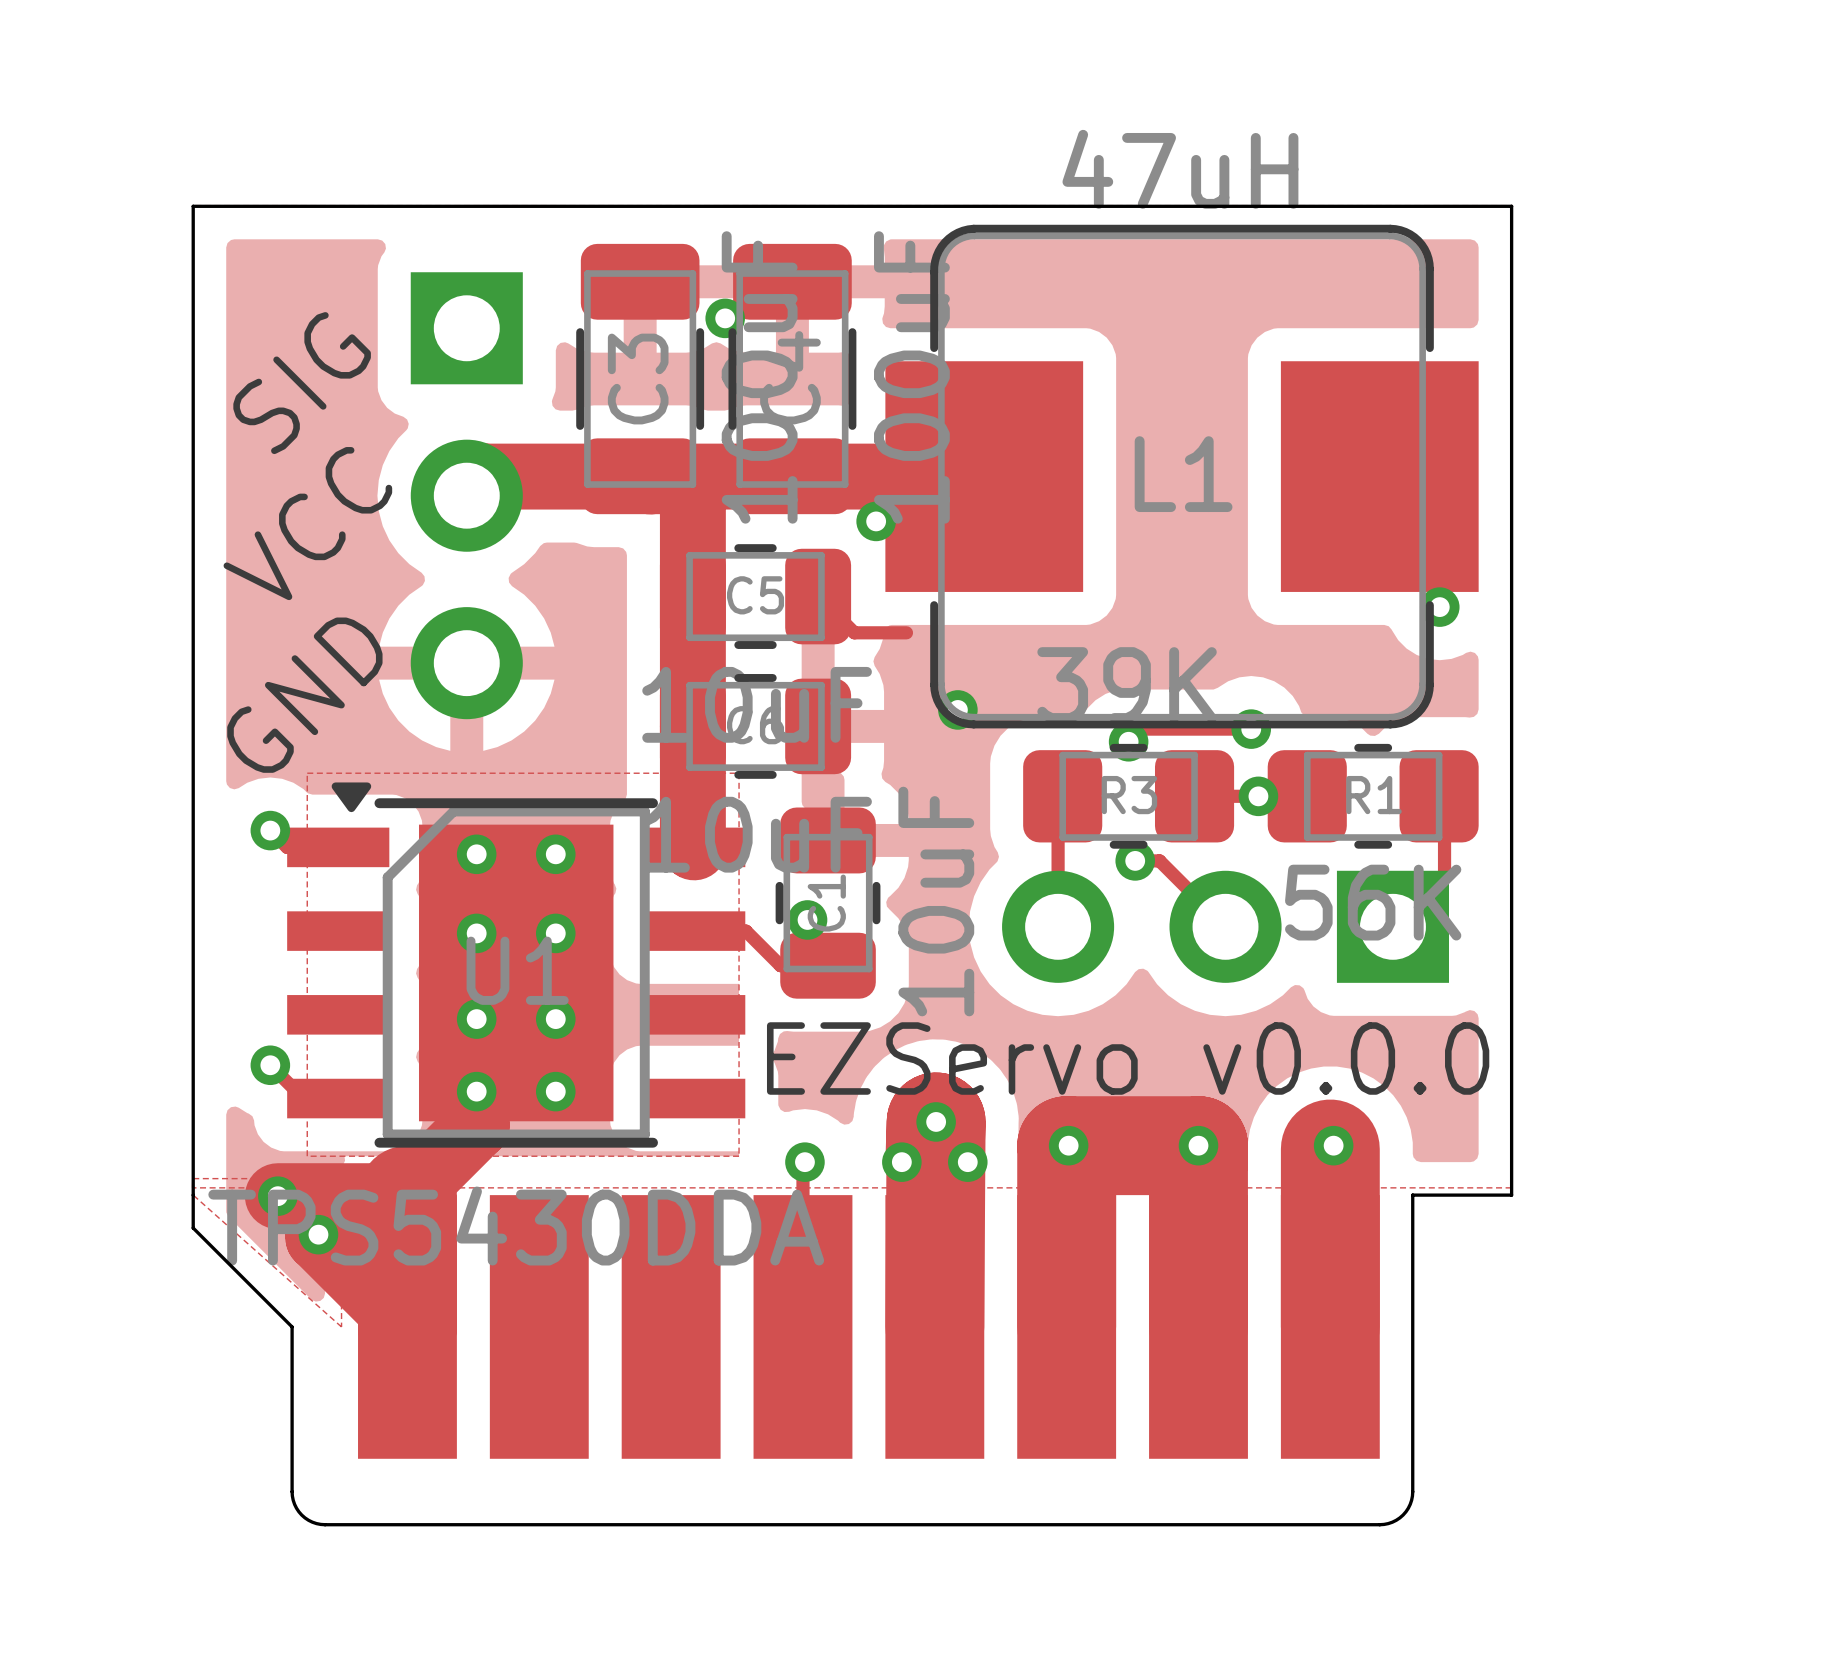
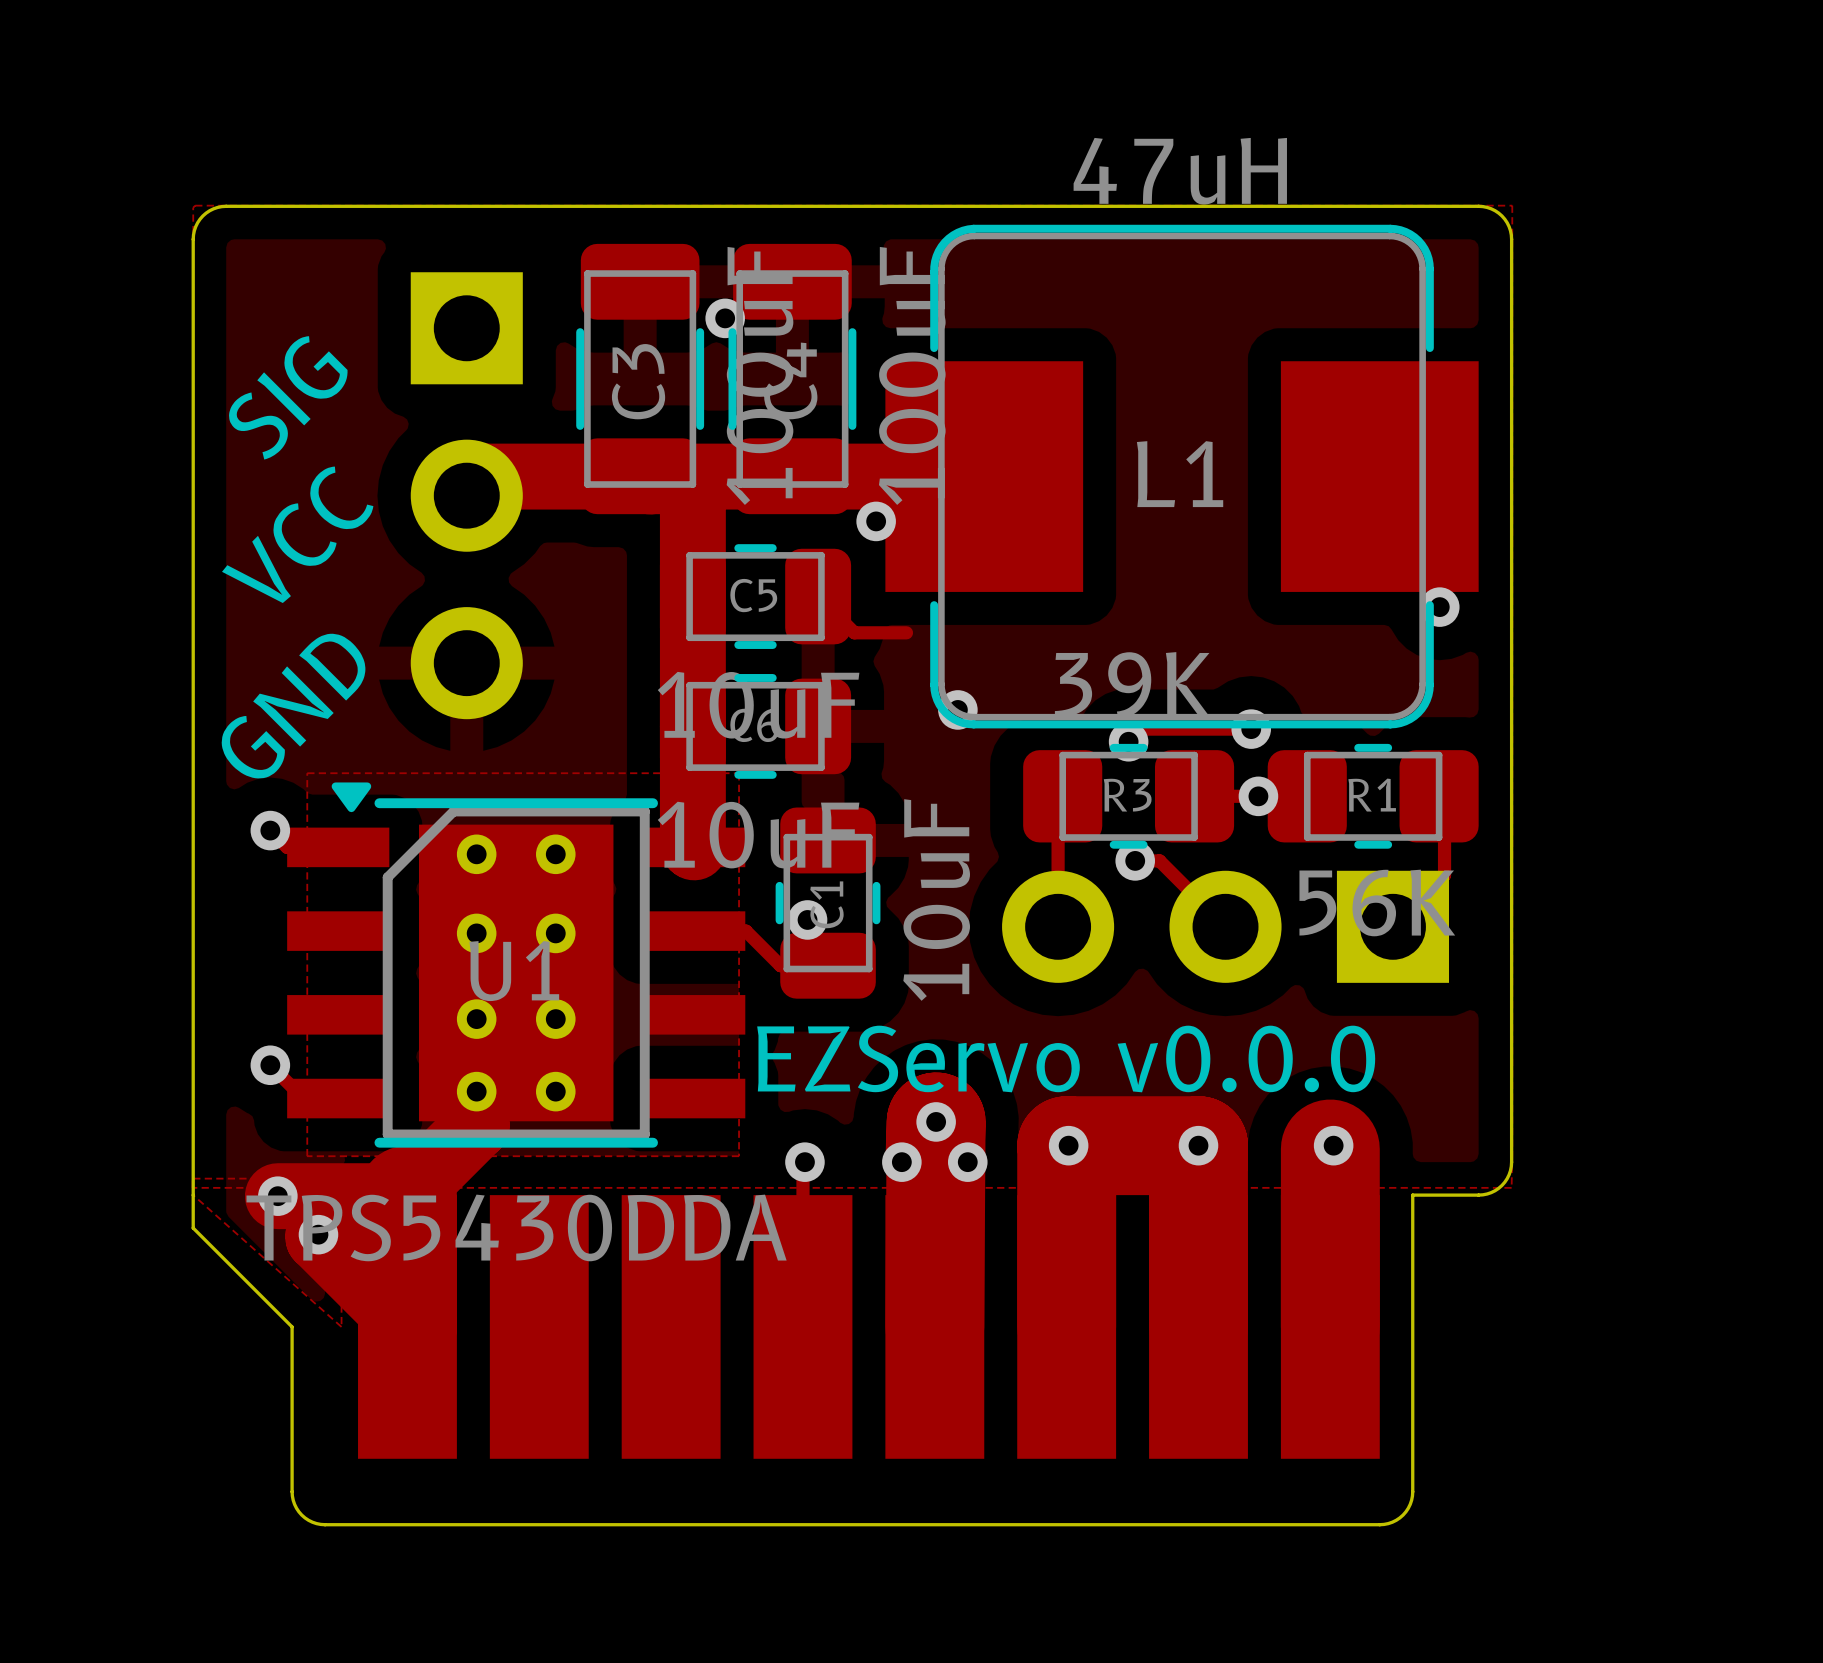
board edge: (226, 206) (193, 206) (193, 239) -> (226, 206) (213, 208) (202, 215) (195, 226) (193, 239)
board edge: (1478, 206) (1511, 206) (1511, 239) -> (1478, 206) (1491, 208) (1501, 215) (1509, 226) (1511, 239)
board edge: (1511, 1162) (1511, 1195) (1478, 1195) -> (1511, 1162) (1509, 1174) (1501, 1185) (1491, 1192) (1478, 1195)

